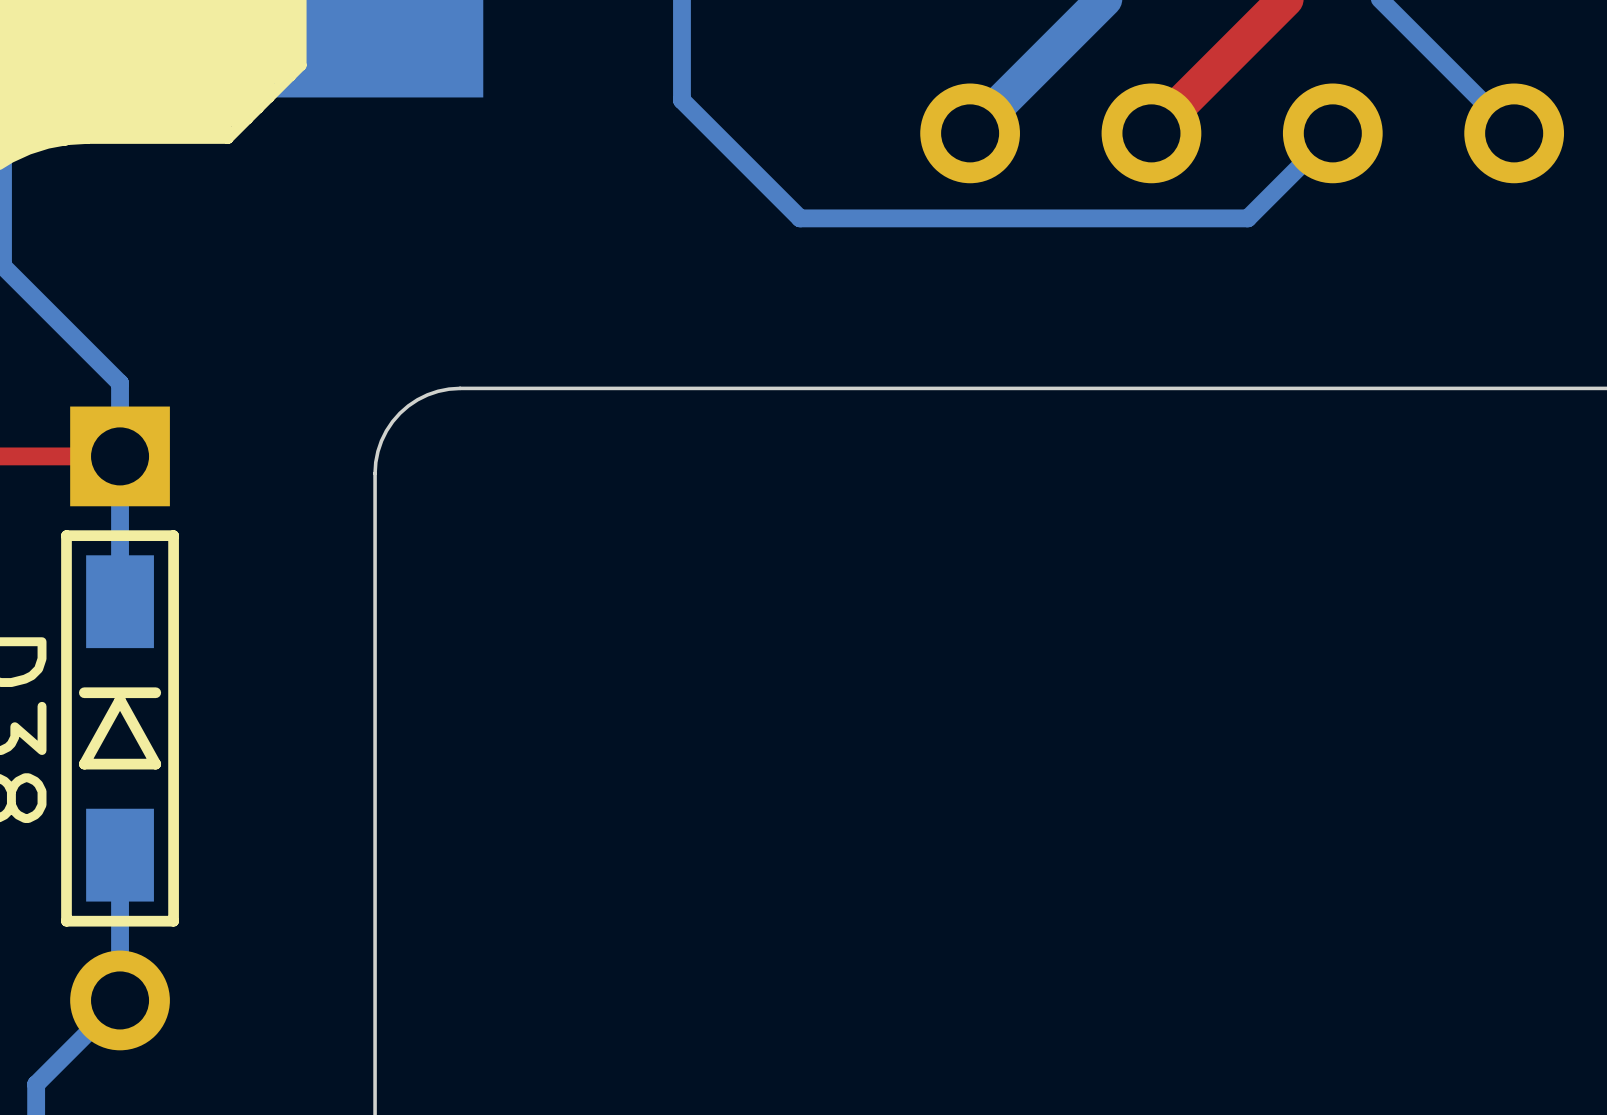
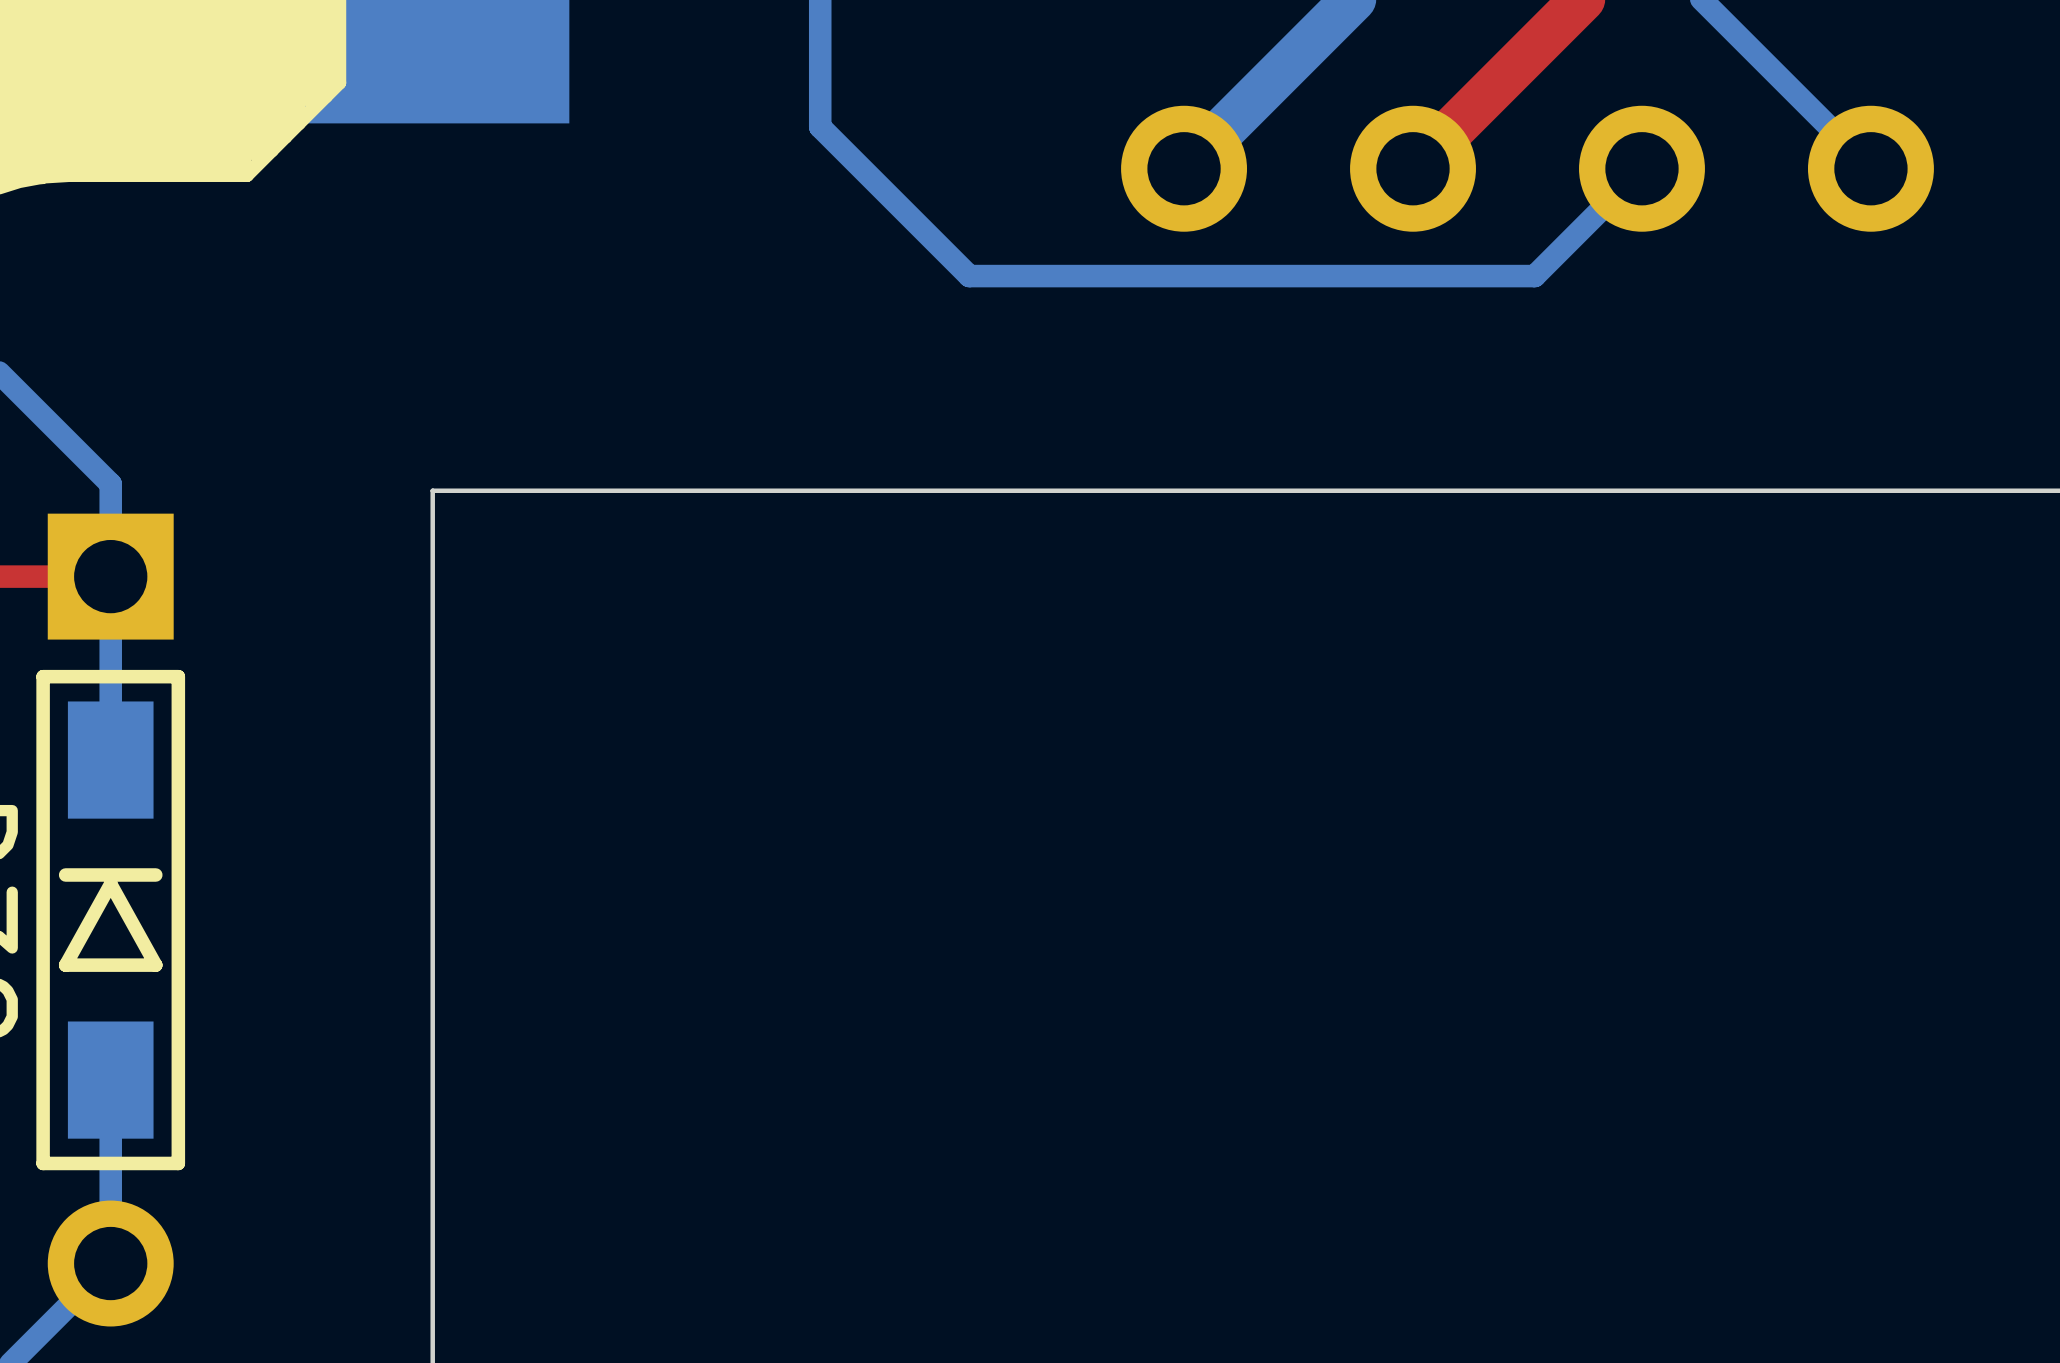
board edge: (460, 388) (427, 394) (399, 413) (381, 440) (375, 473) -> (540, 490) (432, 490) (432, 598)

